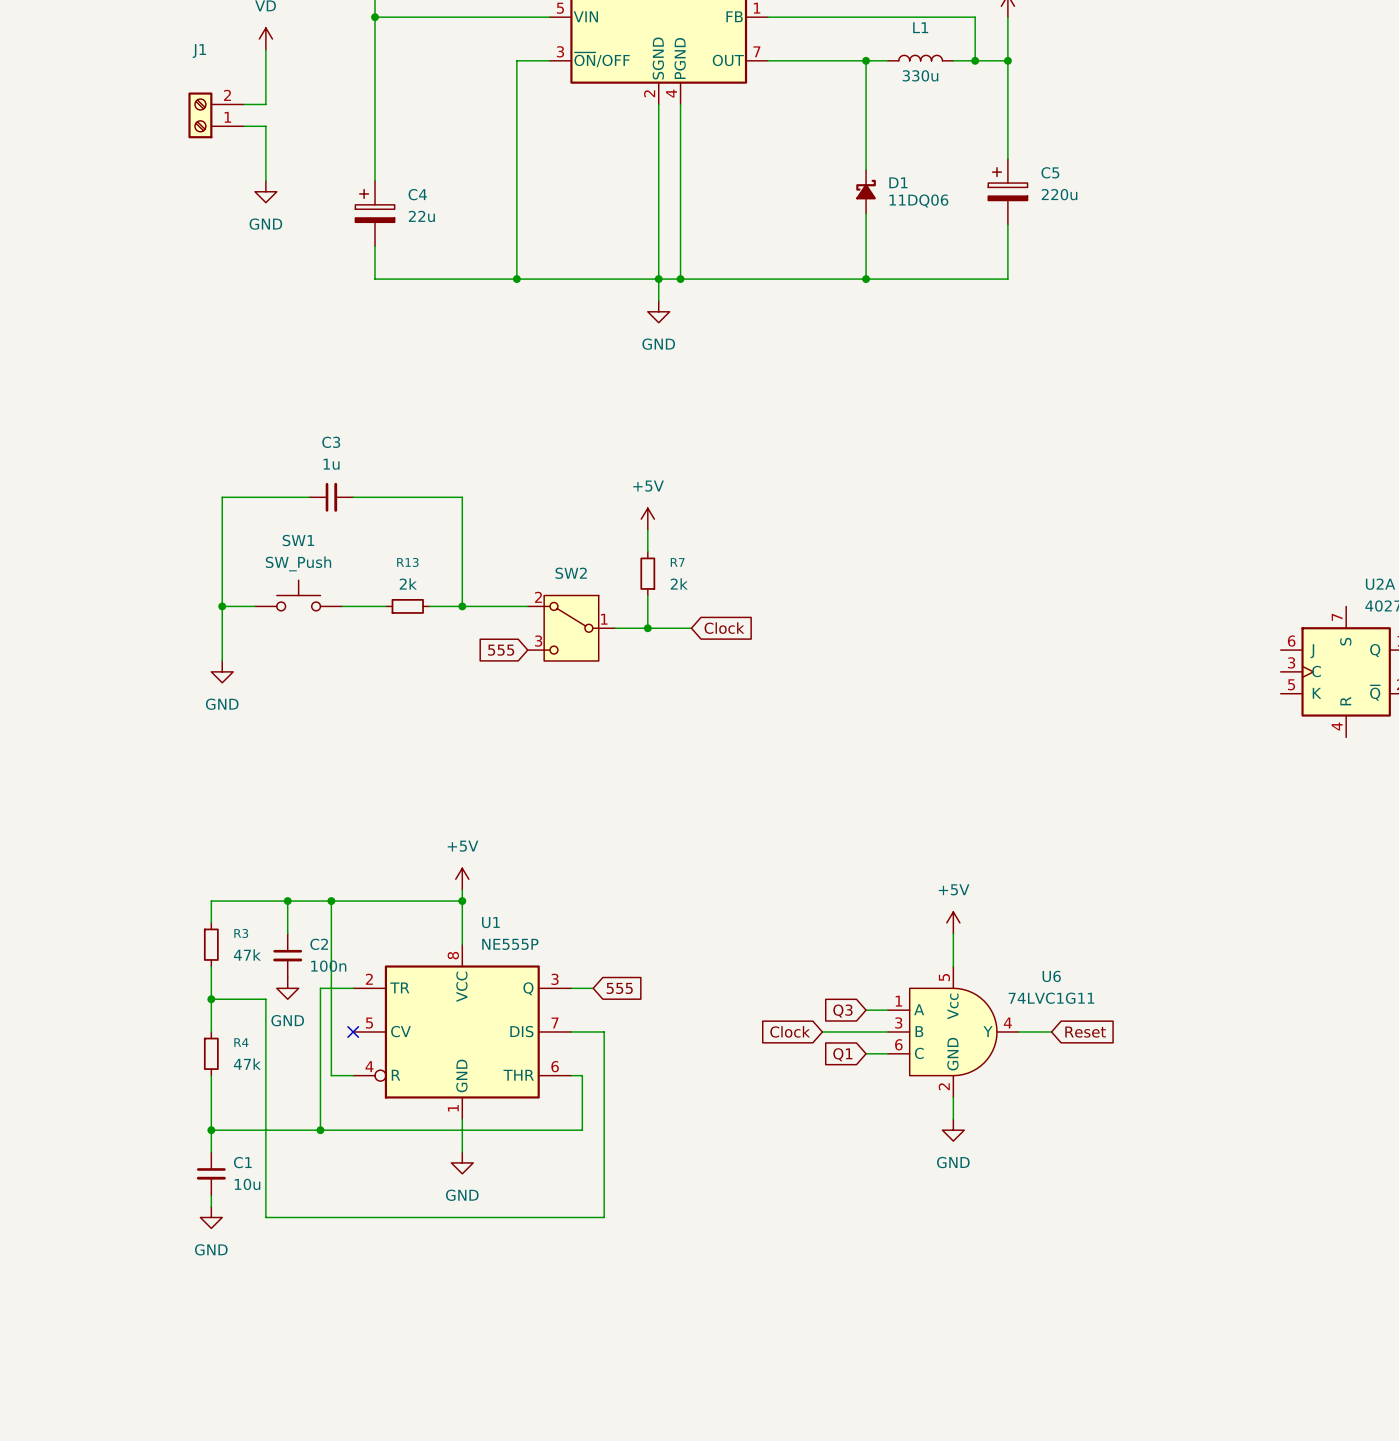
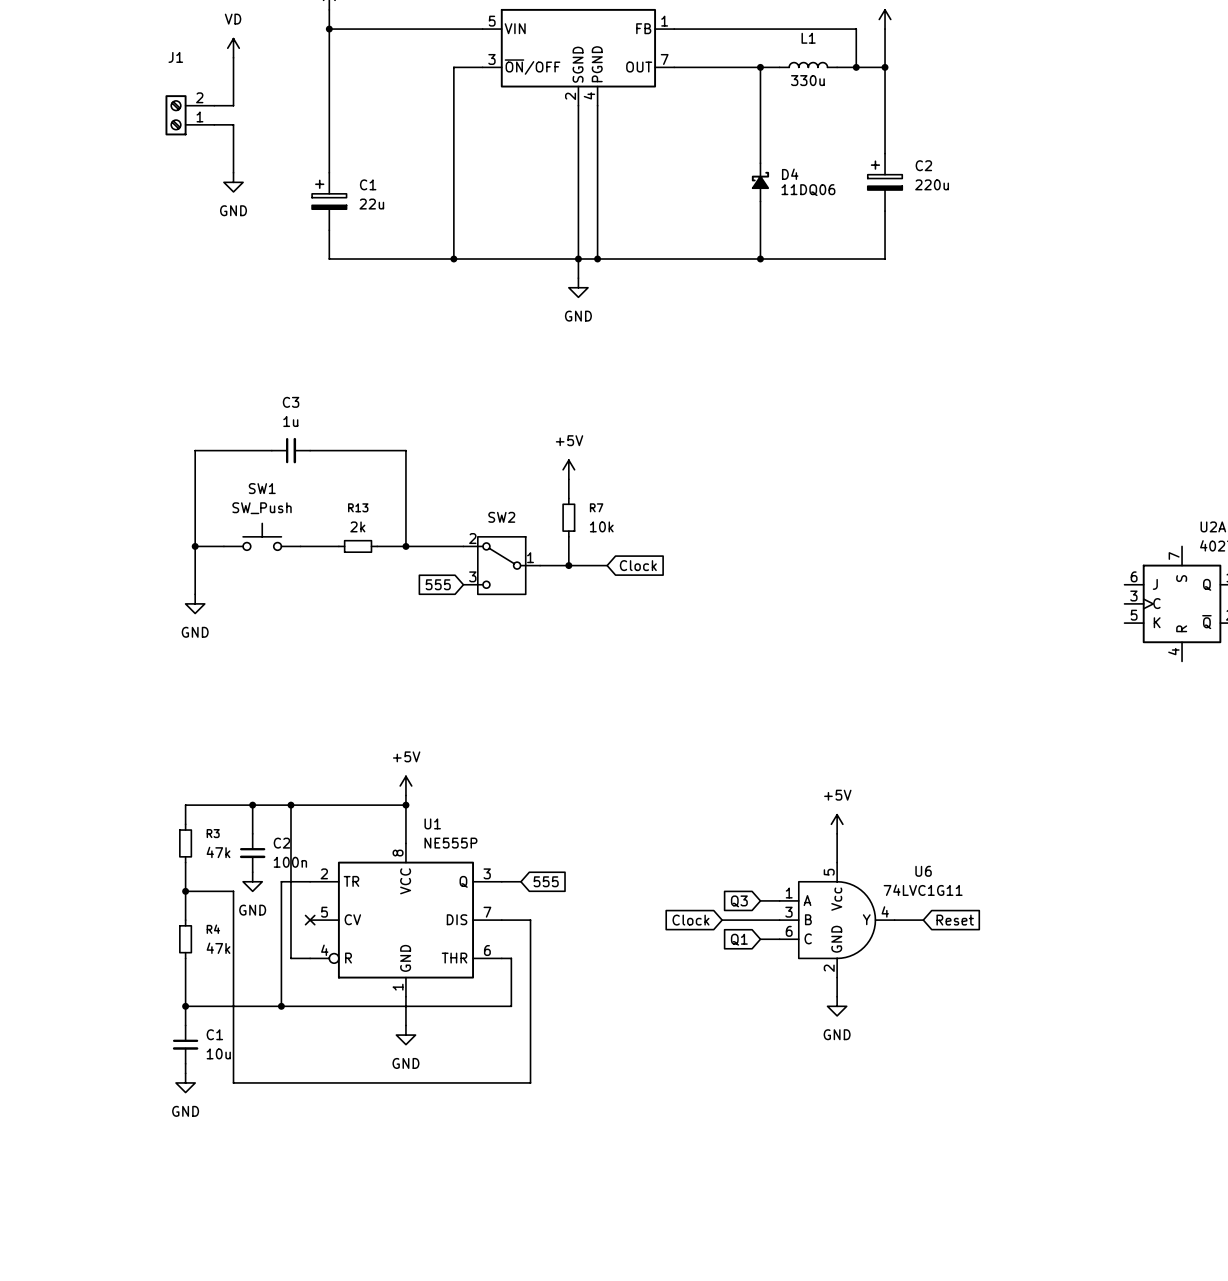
C5 name: C5 (1050, 172) -> C2 (923, 165)
D1 name: D1 (898, 182) -> D4 (790, 174)
C4 name: C4 (417, 194) -> C1 (368, 184)
R7 value: 2k (679, 583) -> 10k (601, 526)

